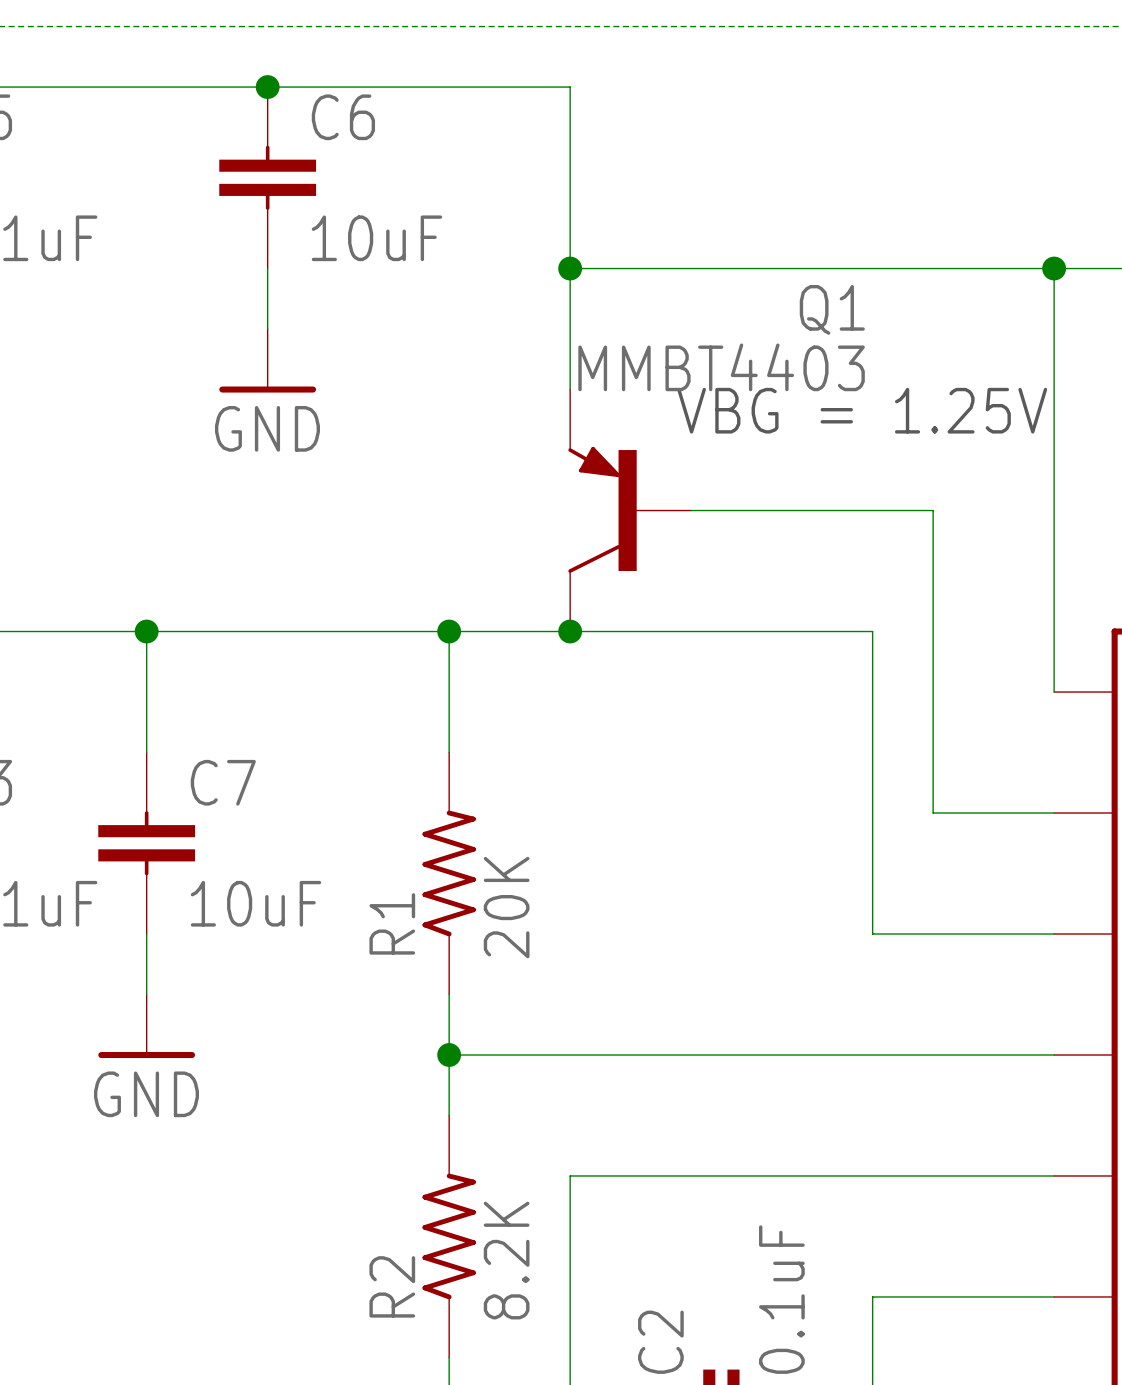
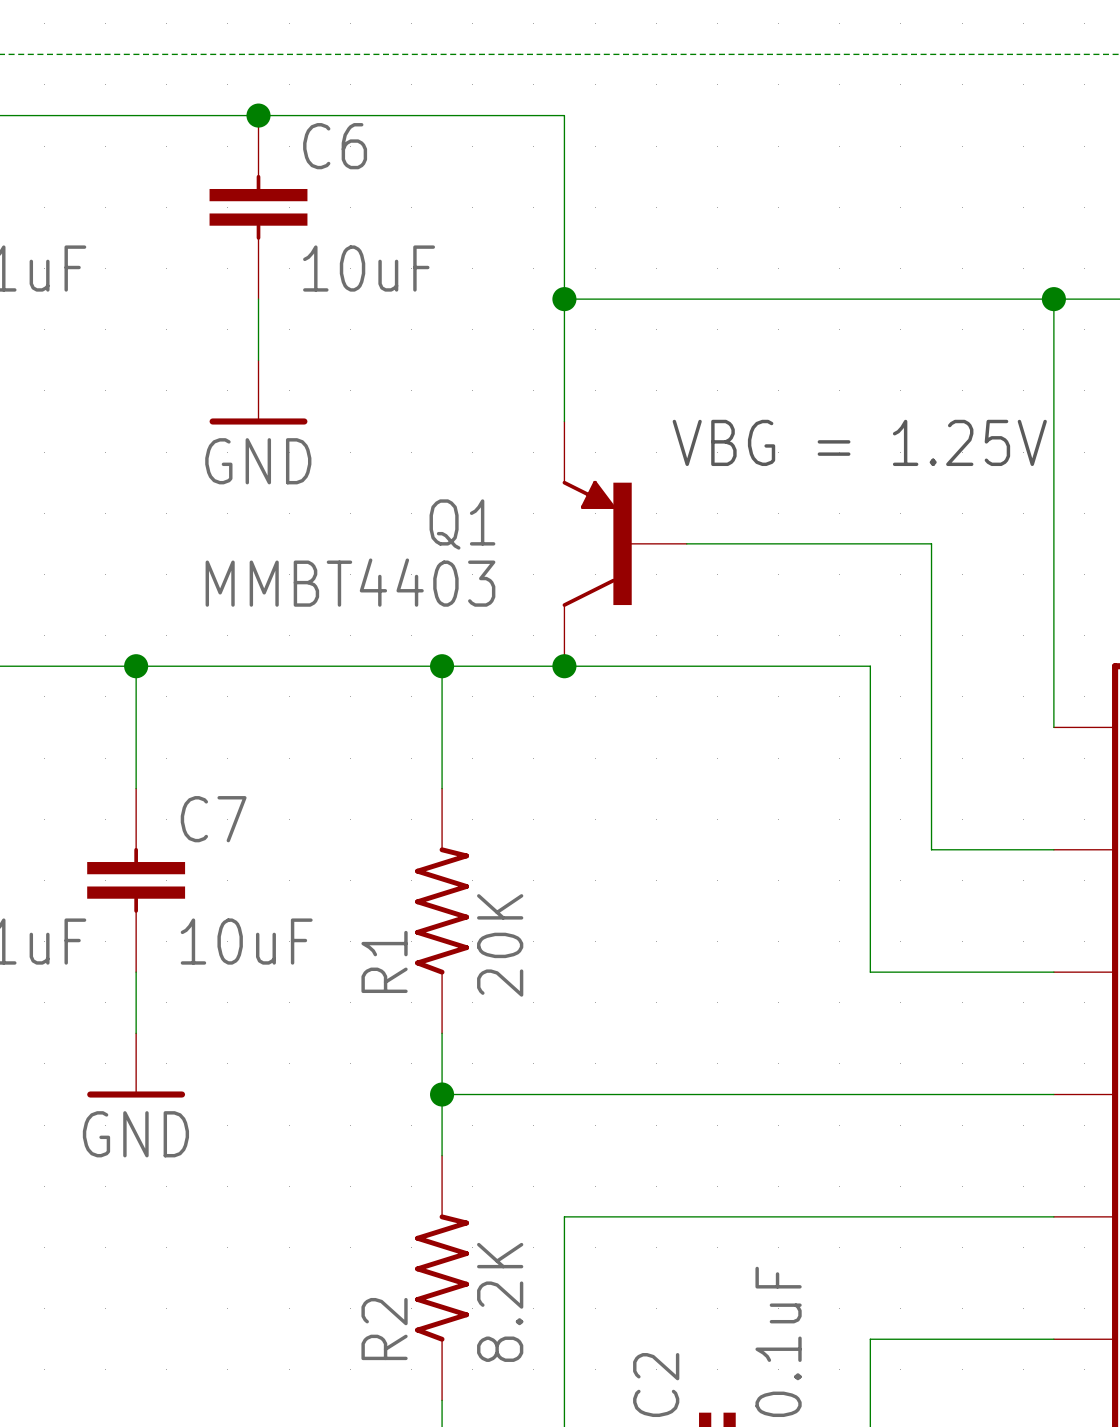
Q1 name position: Q1 (832, 309) -> Q1 (462, 524)
Q1 value position: MMBT4403 (721, 367) -> MMBT4403 (350, 582)
Q1 symbol: [568, 389, 692, 632] -> [562, 421, 687, 667]

